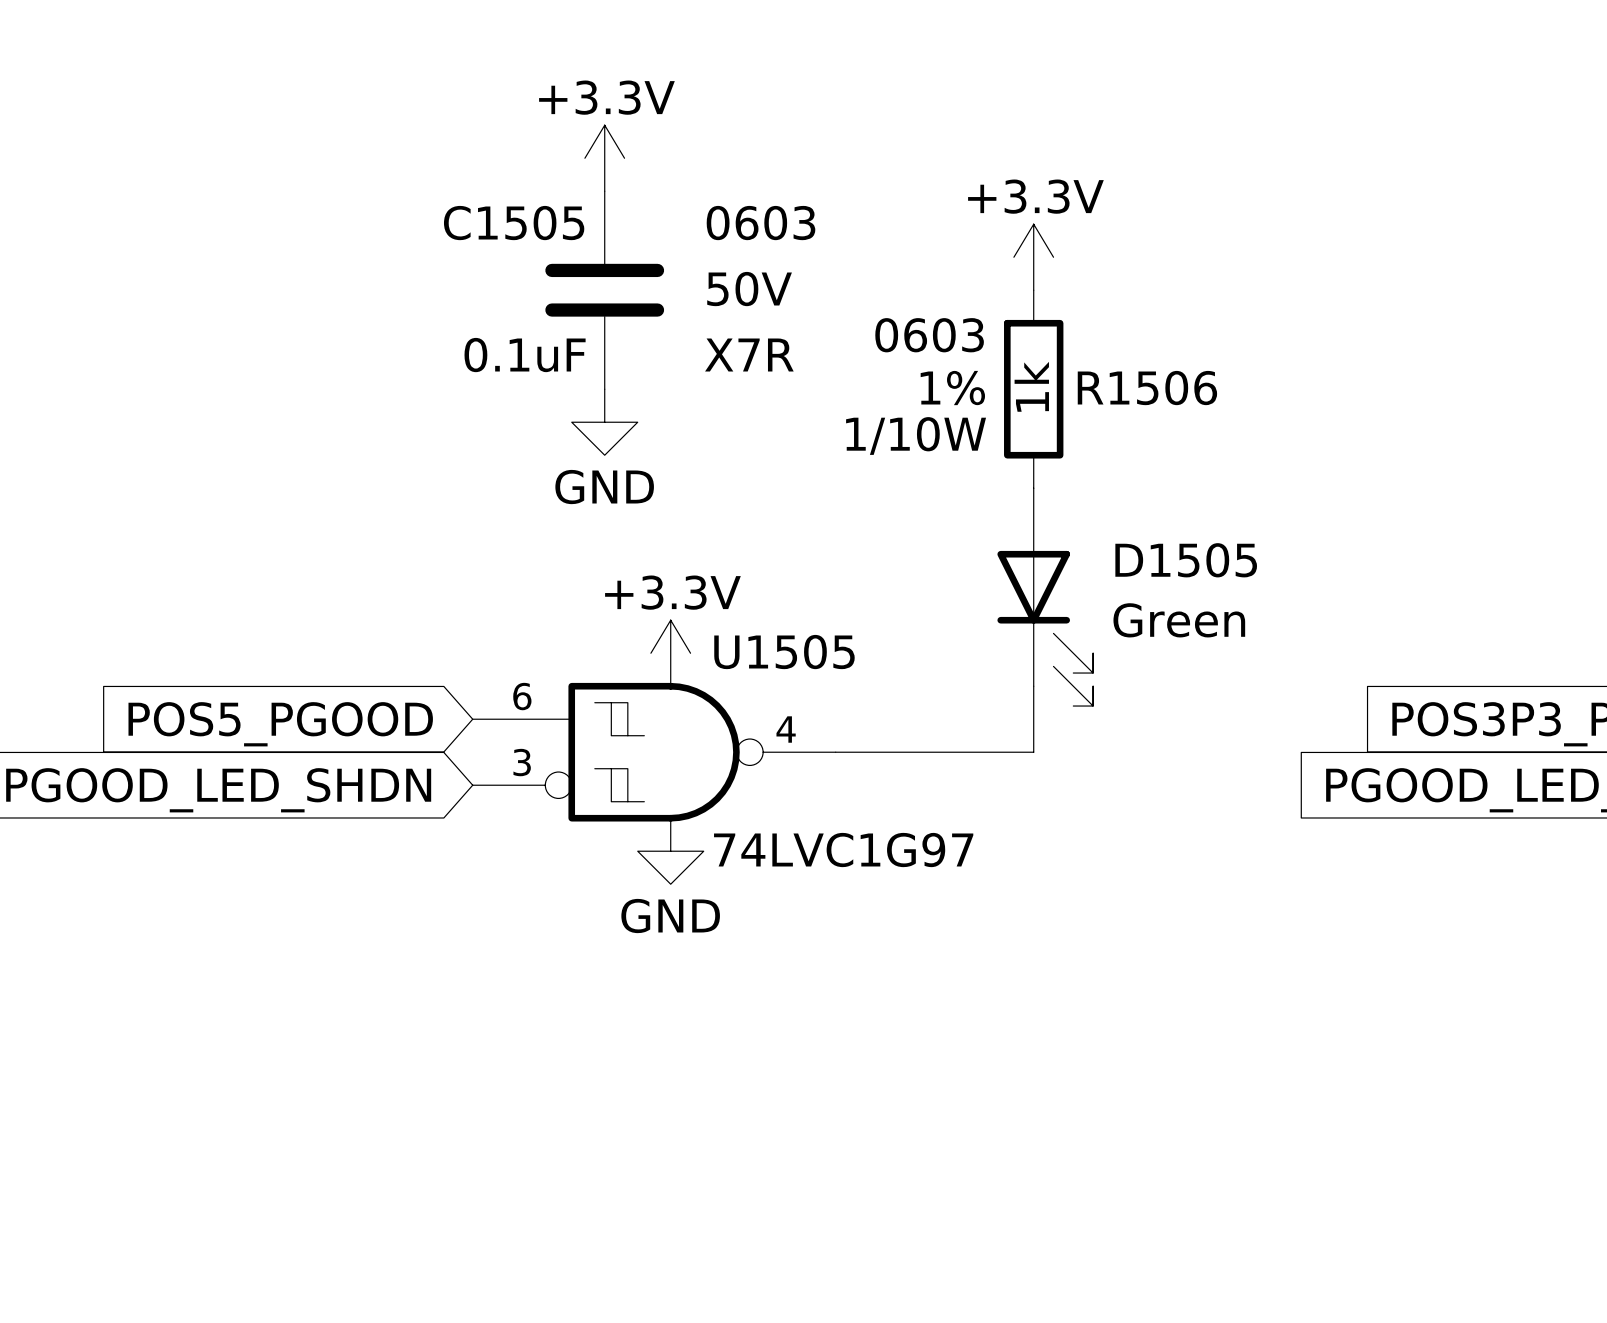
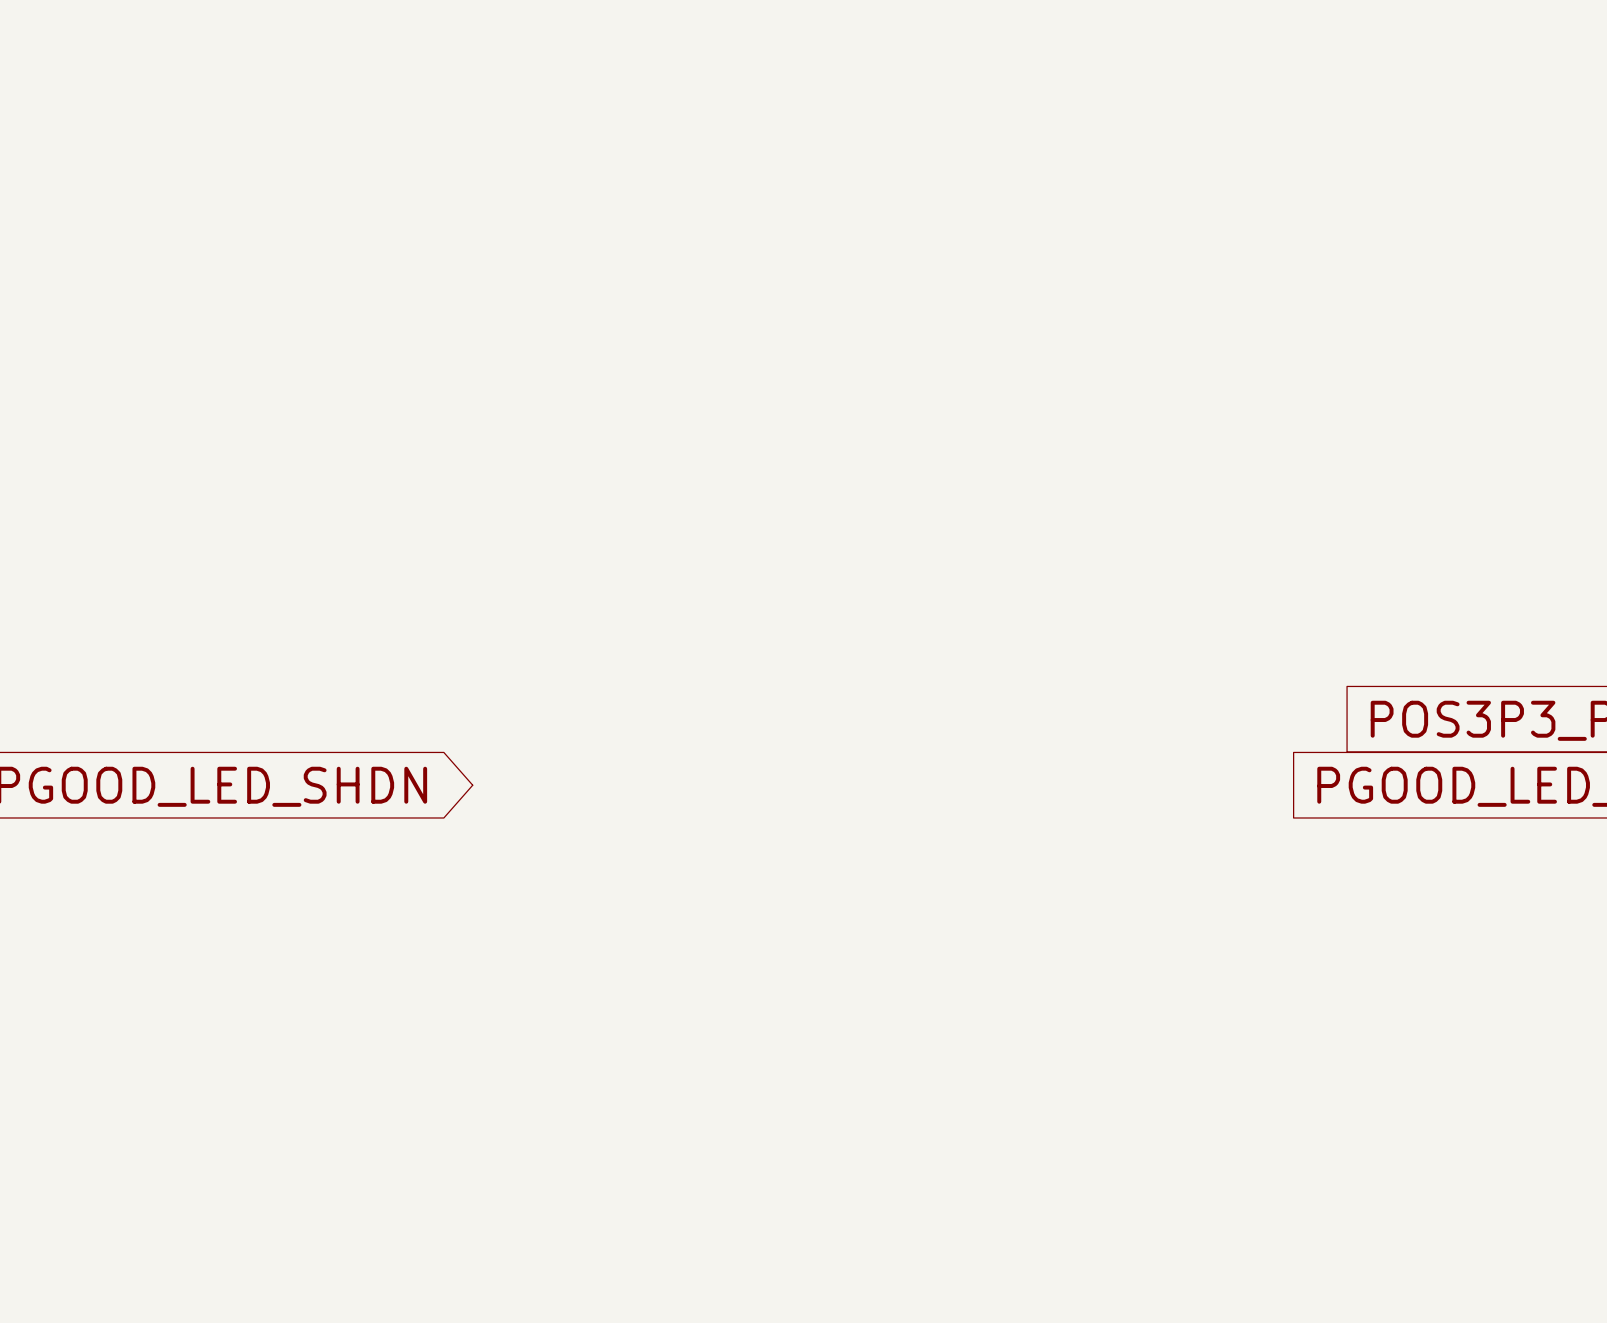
power symbol: +3.3V (604, 158) -> none
power symbol: +3.3V (1033, 257) -> none
C1505: 0.1uF (604, 290) -> none
R1506: 1k (1033, 389) -> none
power symbol: GND (604, 422) -> none
D1505: Green (1045, 597) -> none
power symbol: +3.3V (670, 653) -> none
wire: (1033, 686) (1033, 752) (835, 752) -> none
global label: POS5_PGOOD (280, 724) -> none
U1505: 74LVC1G97 (654, 752) -> none
power symbol: GND (670, 851) -> none

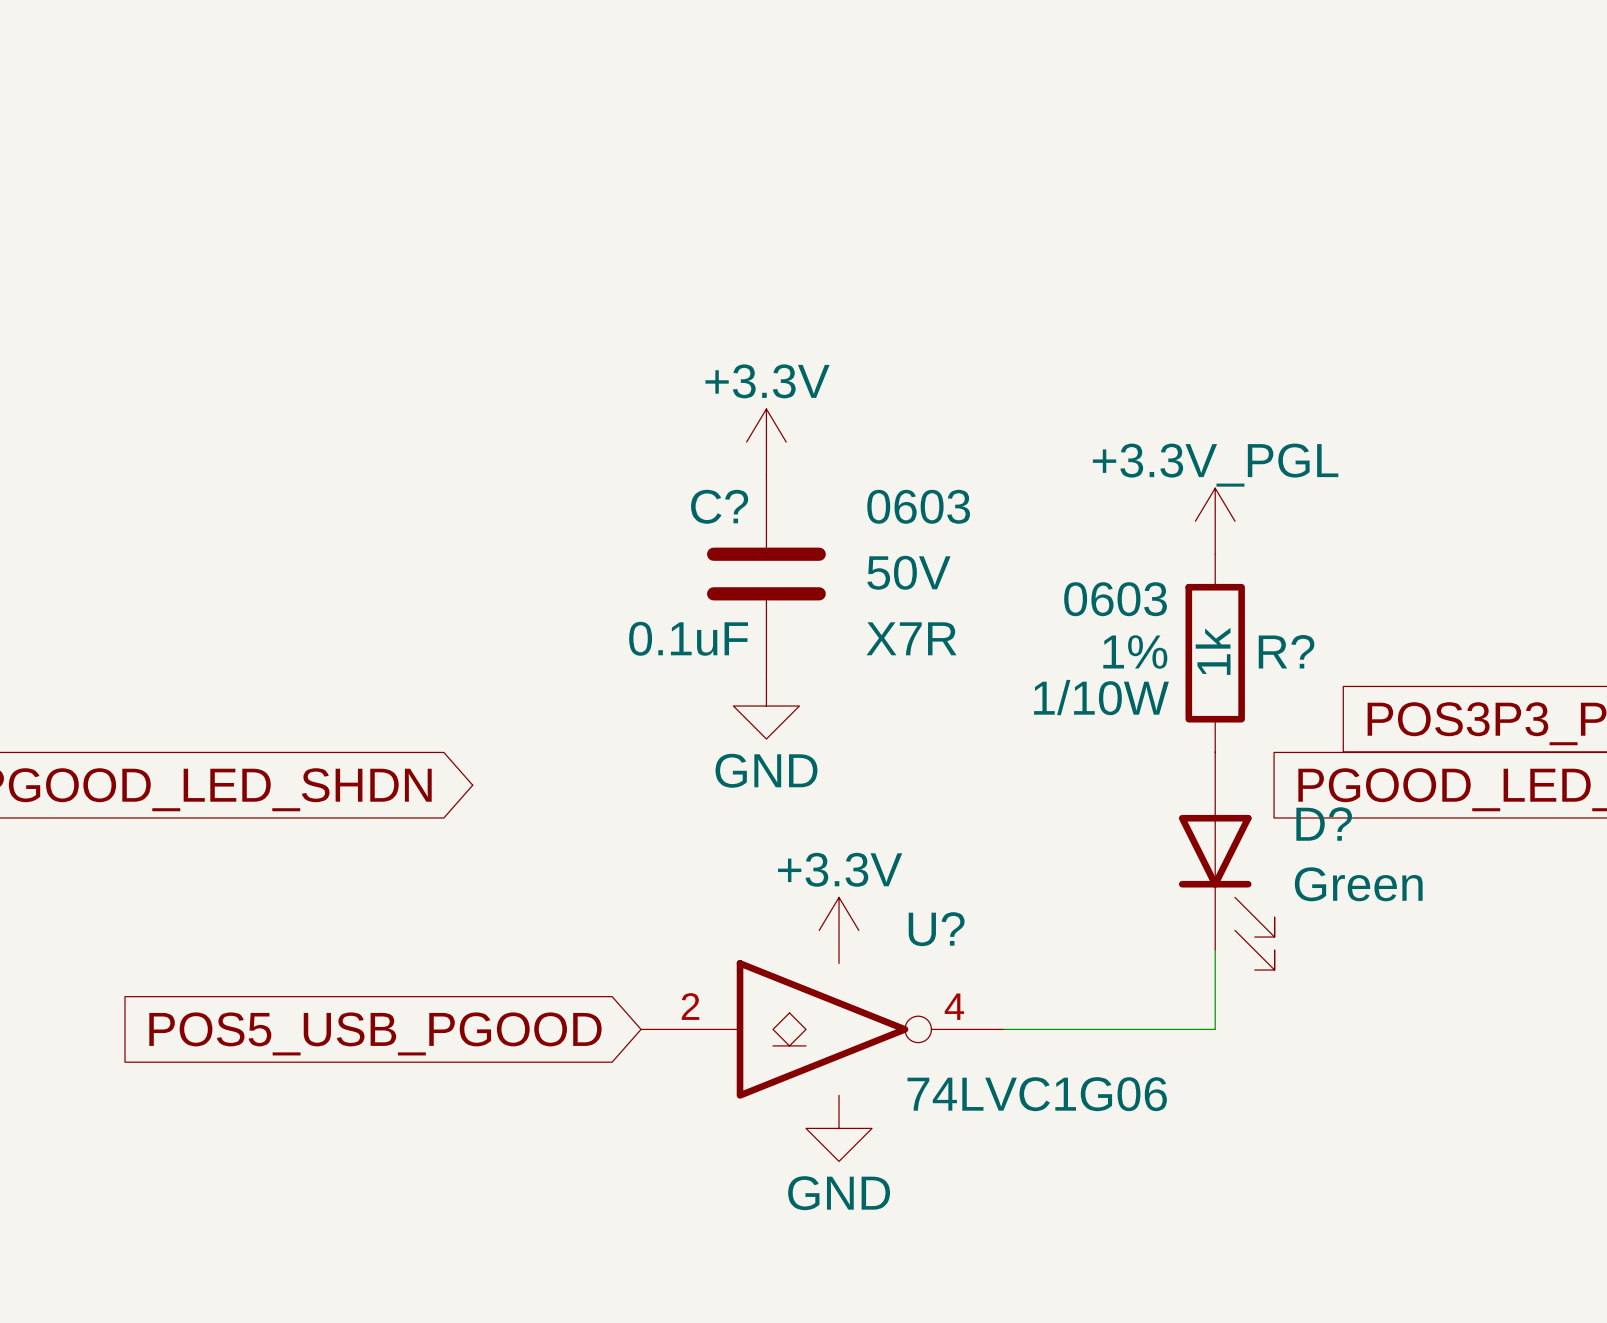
power symbol: none -> +3.3V (766, 442)
power symbol: none -> +3.3V_PGL (1215, 521)
C?: none -> 0.1uF (766, 574)
R?: none -> 1k (1215, 653)
power symbol: none -> GND (766, 706)
D?: none -> Green (1226, 861)
power symbol: none -> +3.3V (839, 930)
wire: none -> (1215, 950) (1215, 1029) (1004, 1029)
U?: none -> 74LVC1G06 (822, 1029)
global label: none -> POS5_USB_PGOOD (375, 1033)
power symbol: none -> GND (839, 1128)

